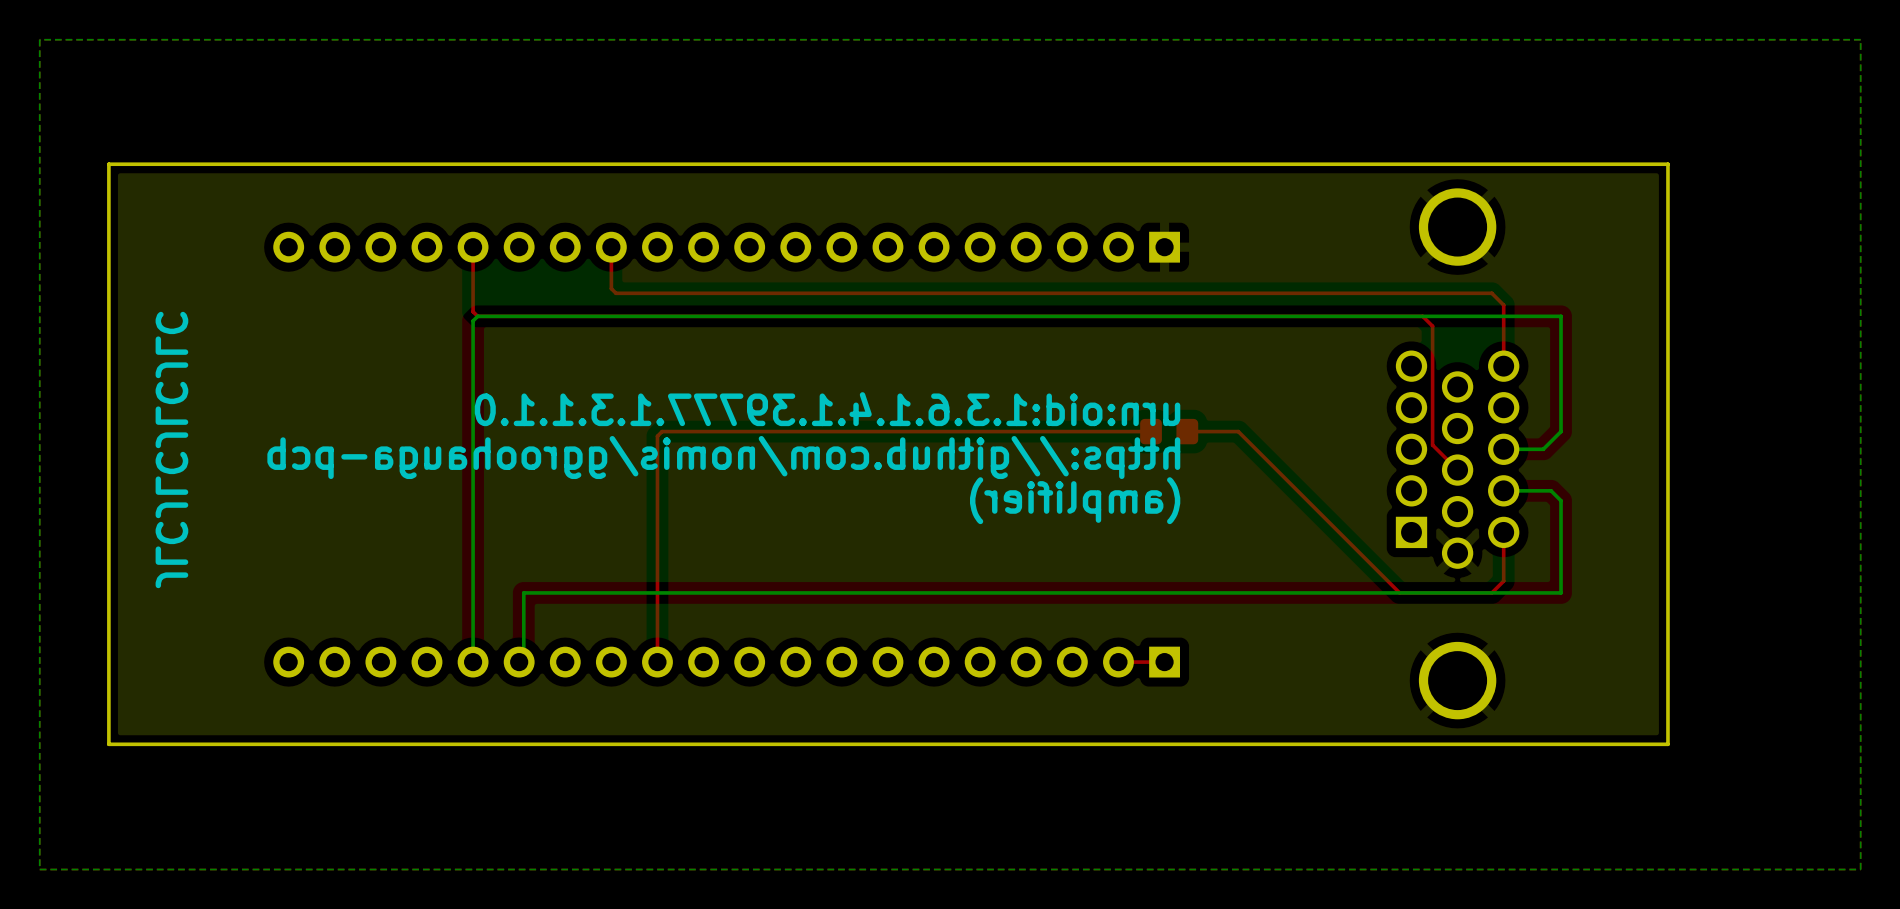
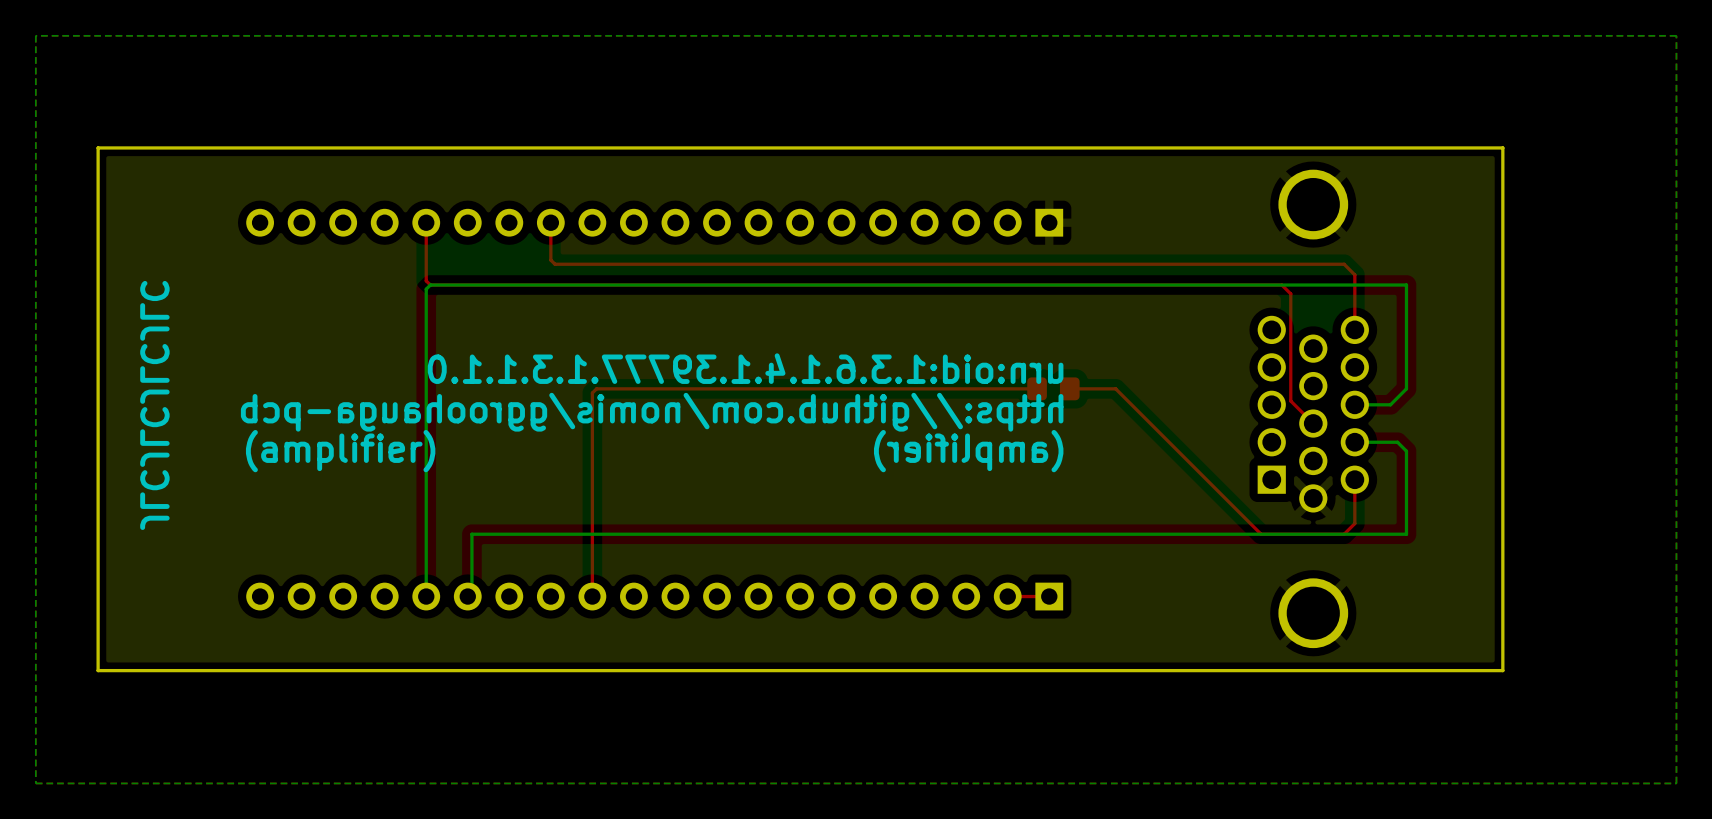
text: none -> (amplifier) (340, 451)

